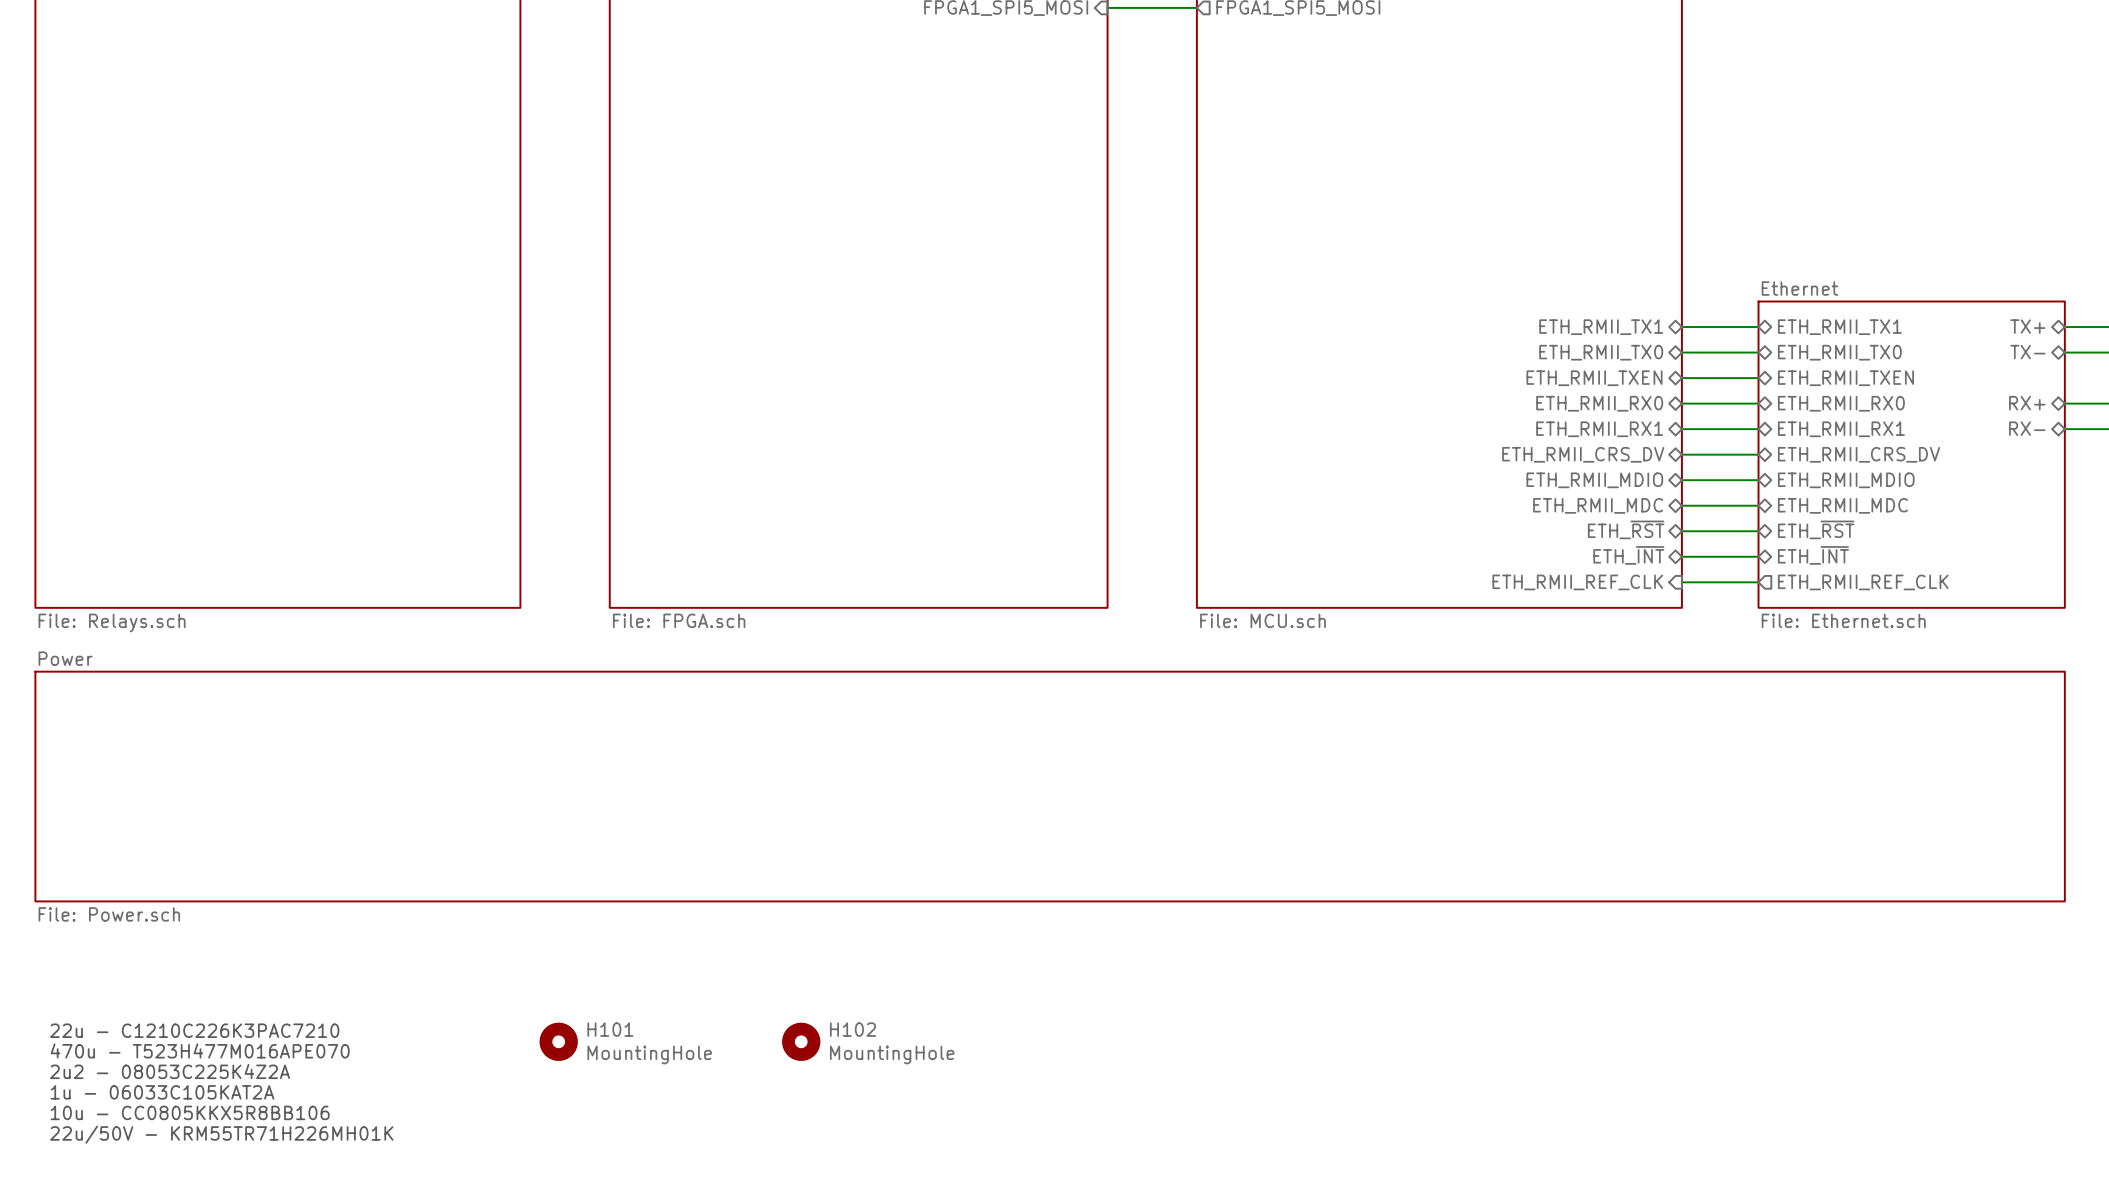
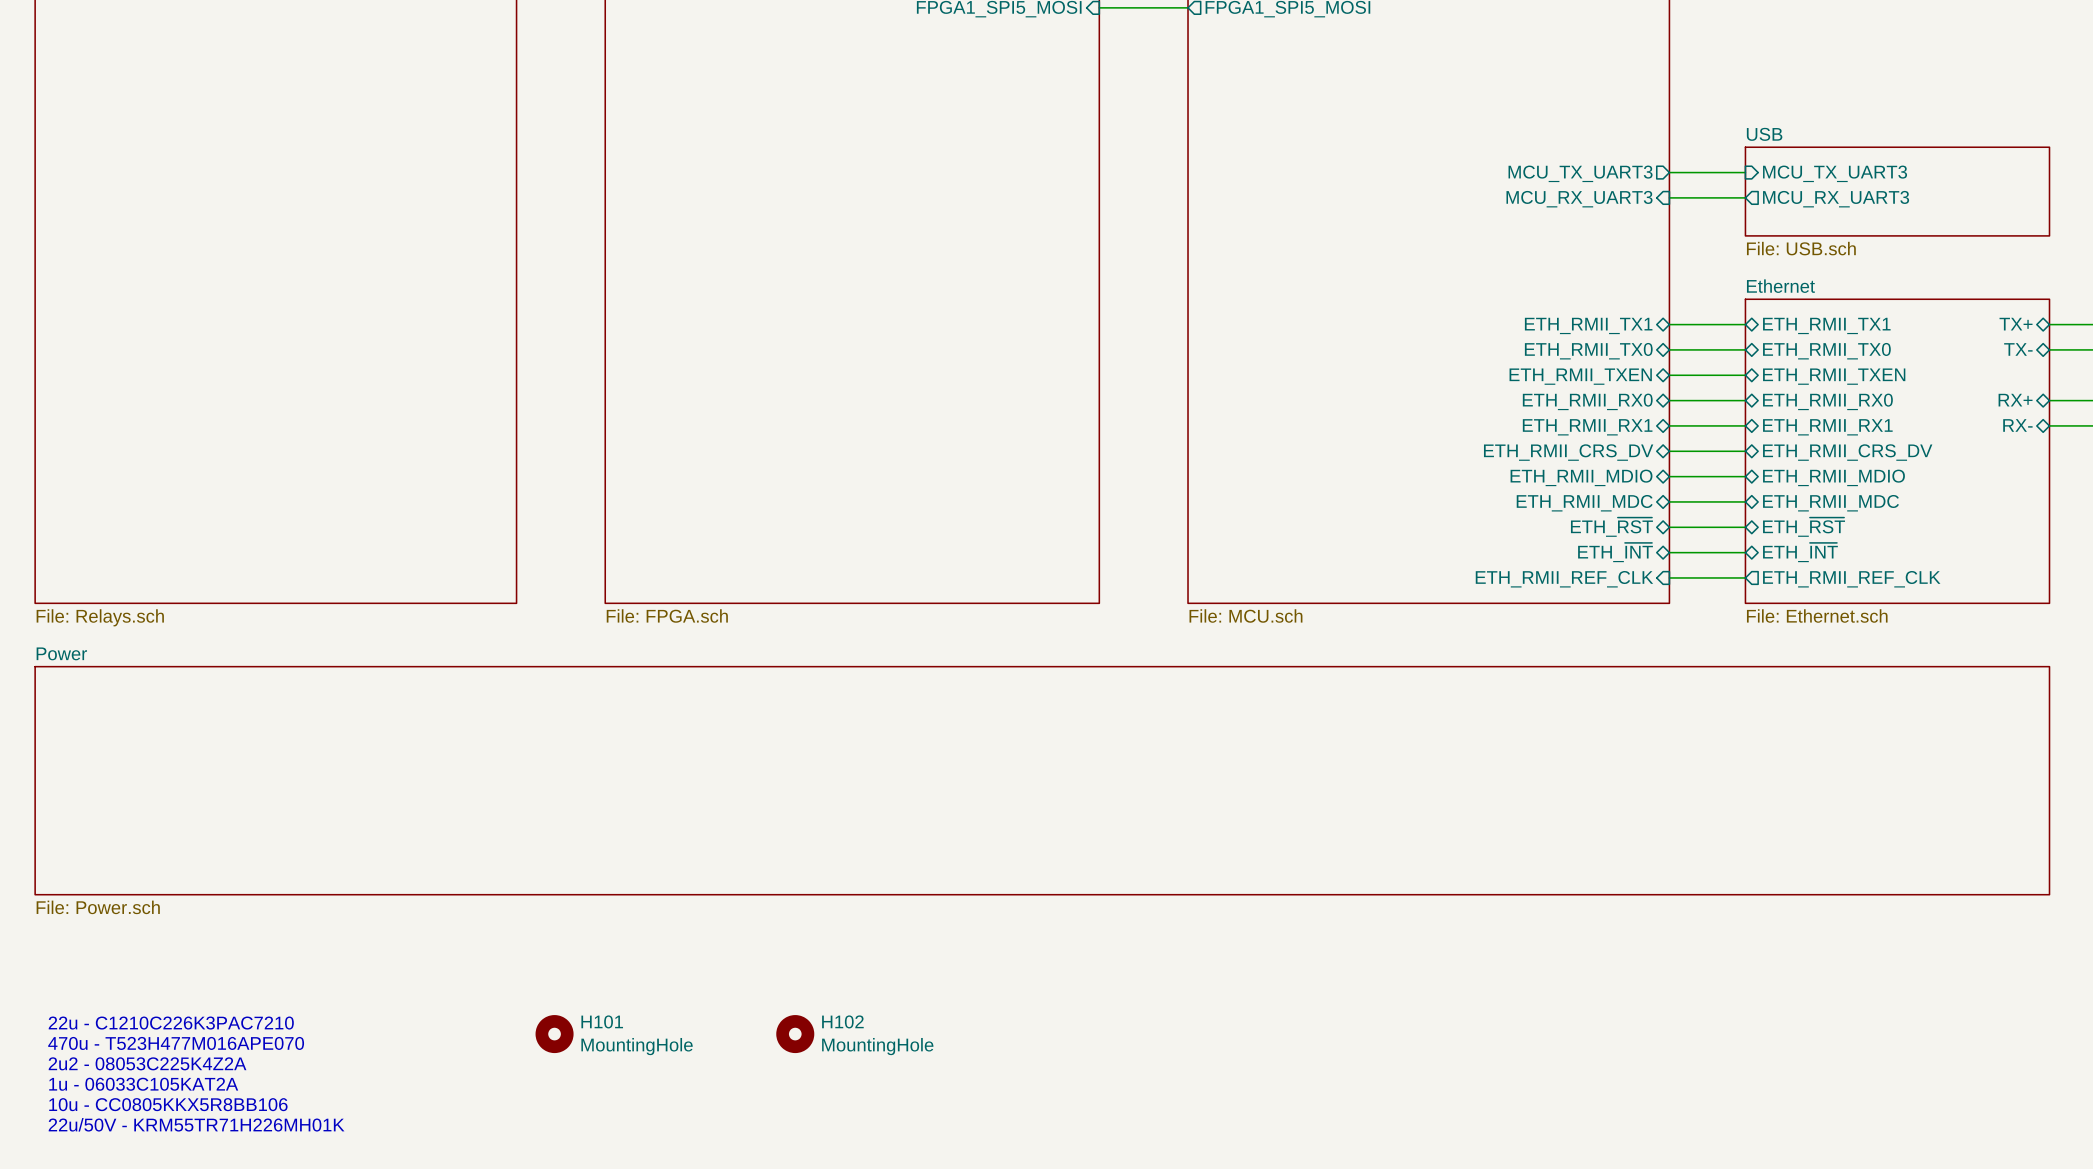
sheet pin: none -> MCU_TX_UART3 (1580, 173)
wire: none -> (1669, 172) (1745, 172)
sheet pin: none -> MCU_TX_UART3 (1835, 173)
sheet USB: none -> File: USB.sch (1897, 191)
sheet pin: none -> MCU_RX_UART3 (1579, 199)
wire: none -> (1669, 197) (1745, 197)
sheet pin: none -> MCU_RX_UART3 (1836, 199)

